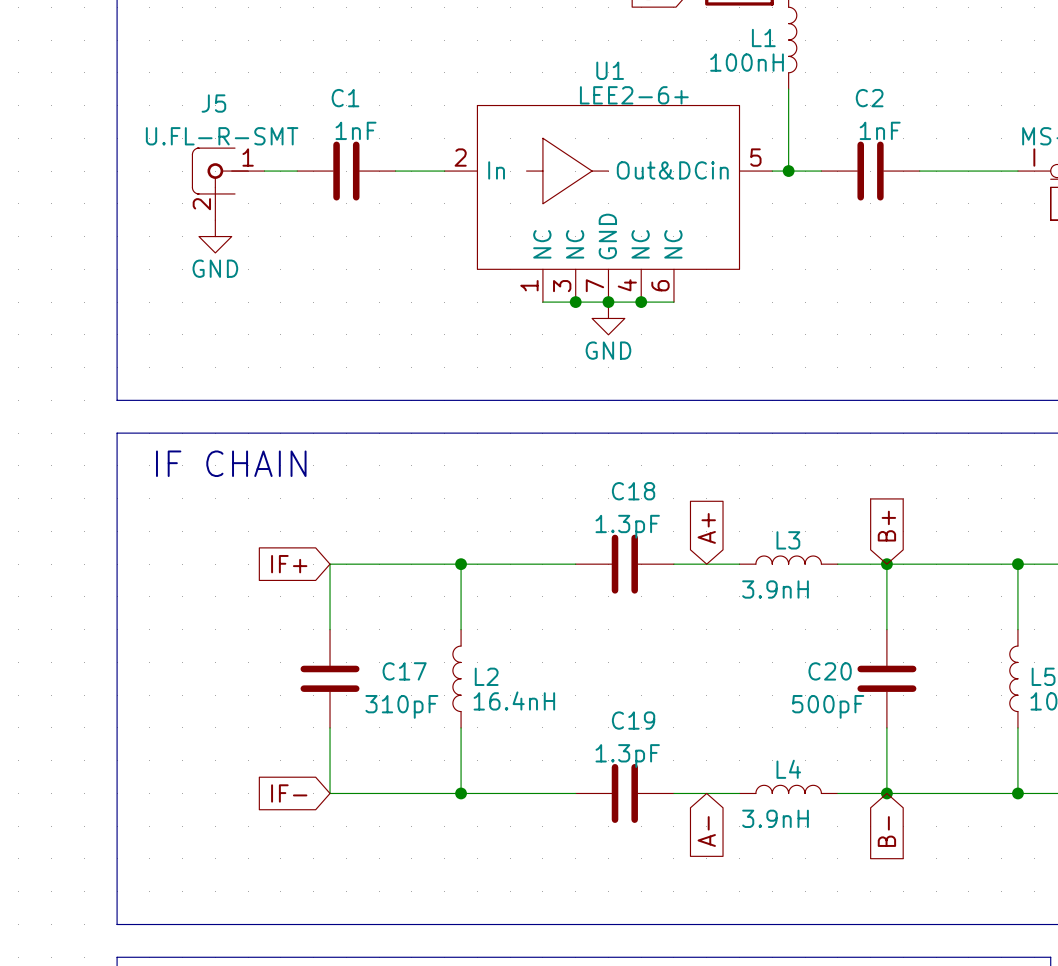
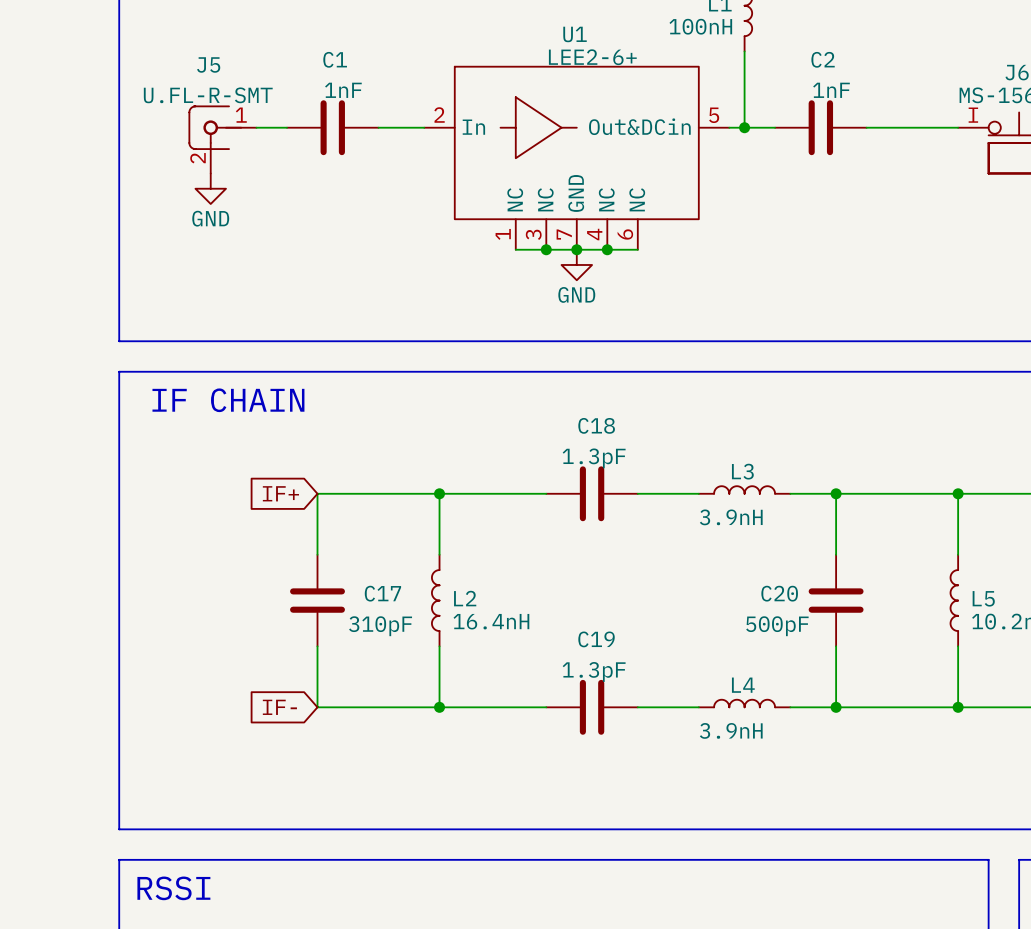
global label: B+ (886, 526) -> none
global label: A+ (706, 528) -> none
global label: A- (706, 831) -> none
global label: B- (886, 831) -> none

